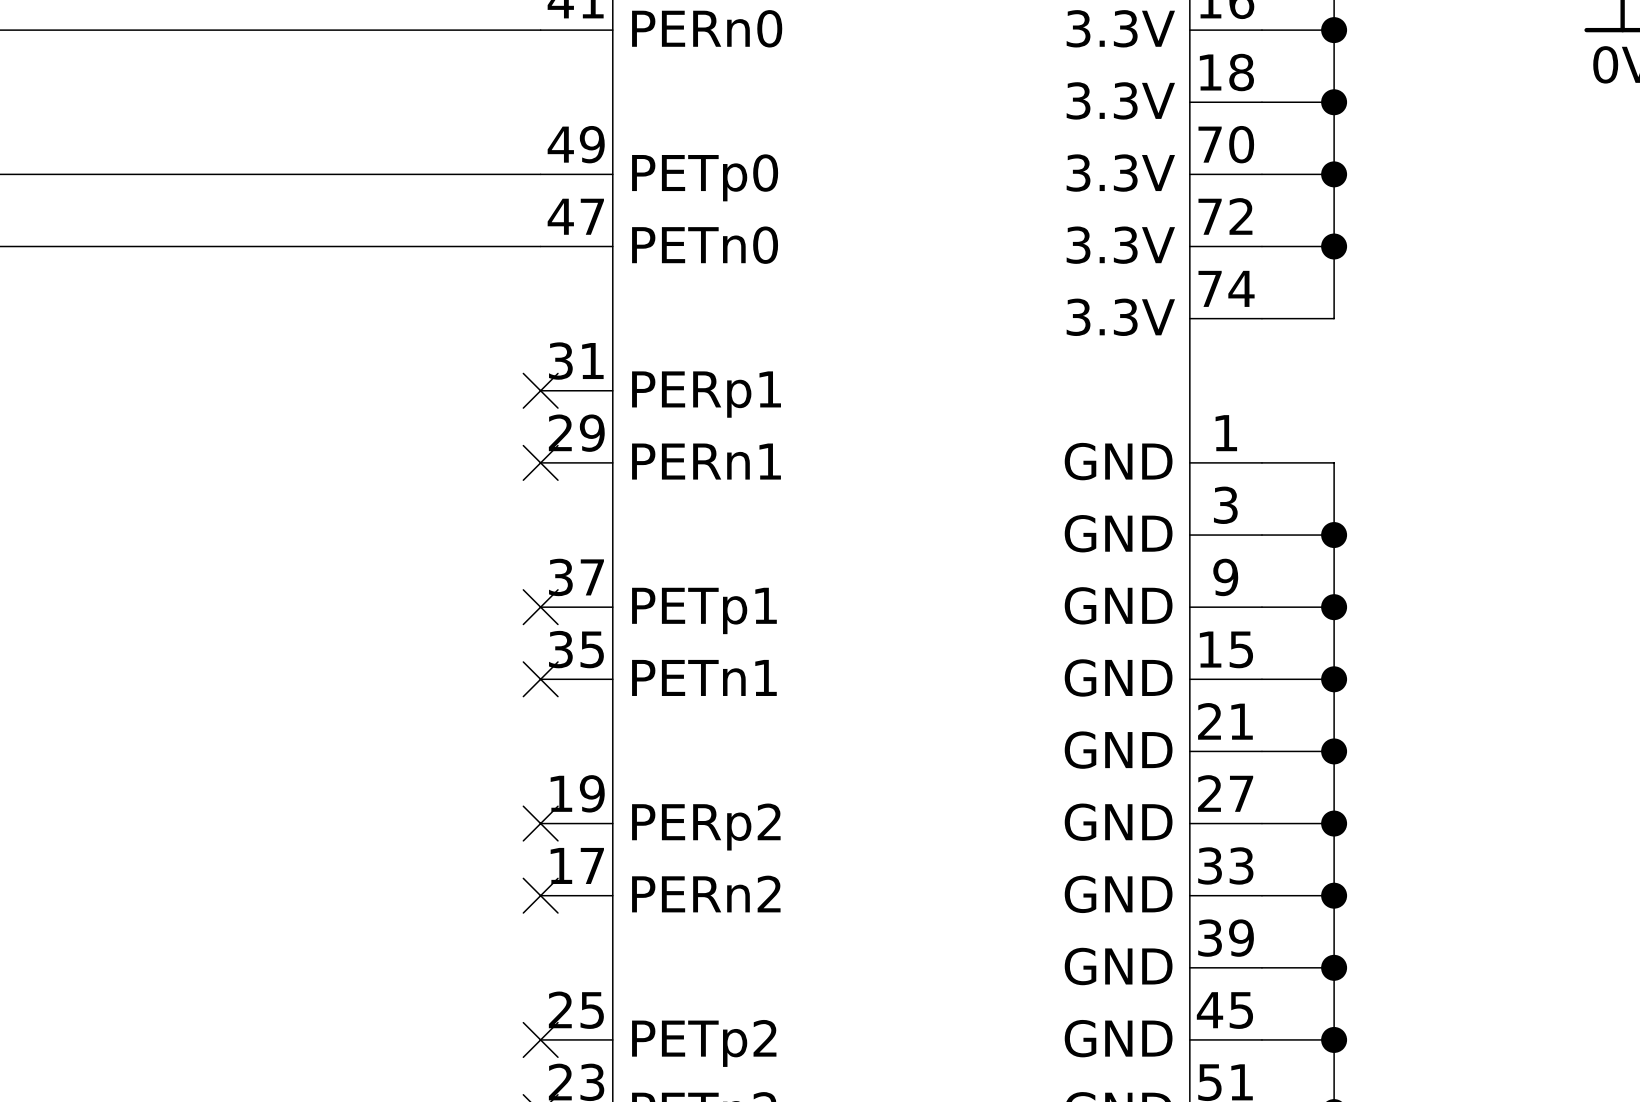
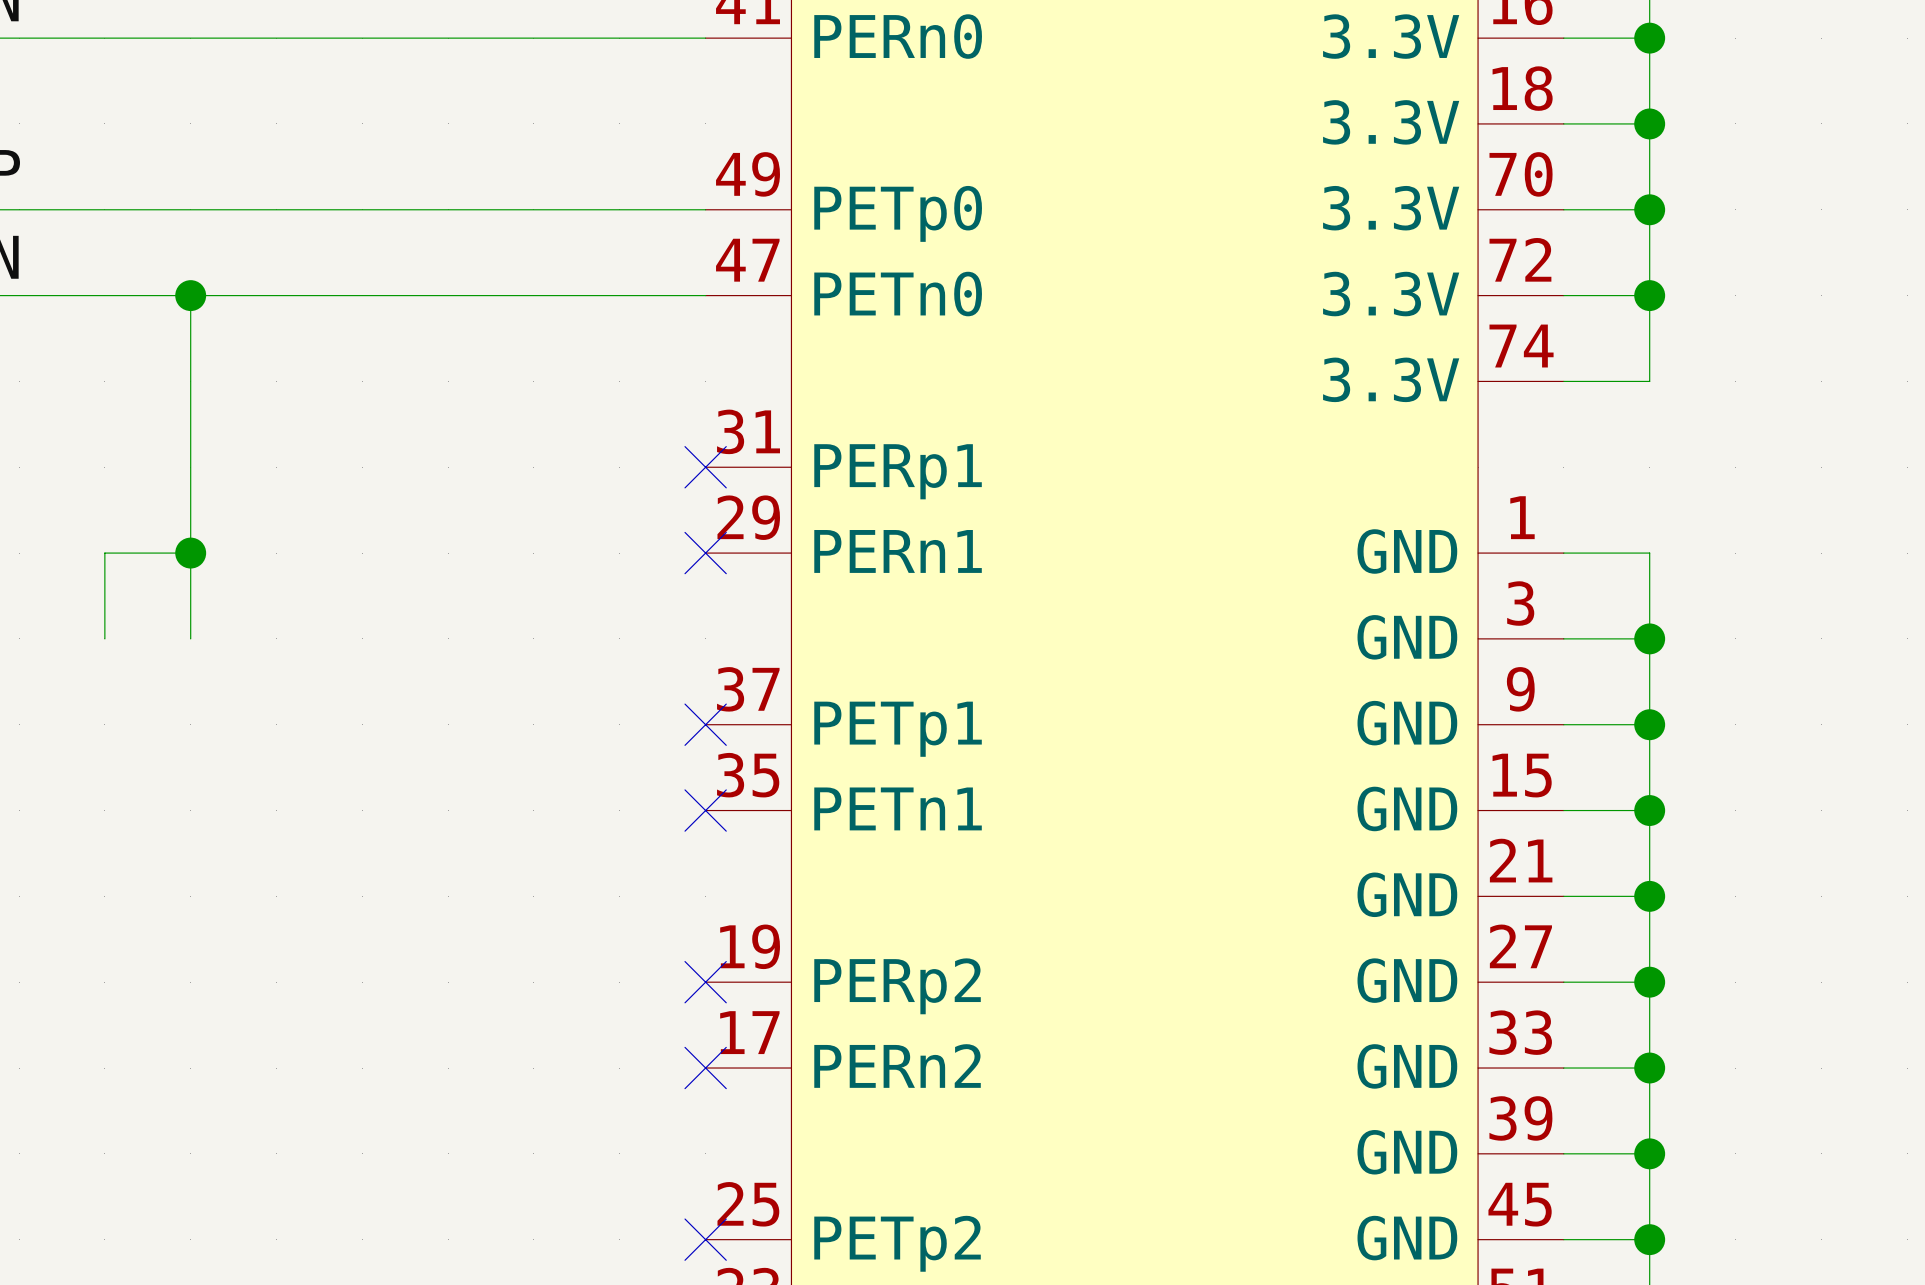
wire: none -> (190, 295) (190, 638)
junction: none -> (190, 295)
wire: none -> (190, 553) (104, 553) (104, 638)
junction: none -> (190, 553)

